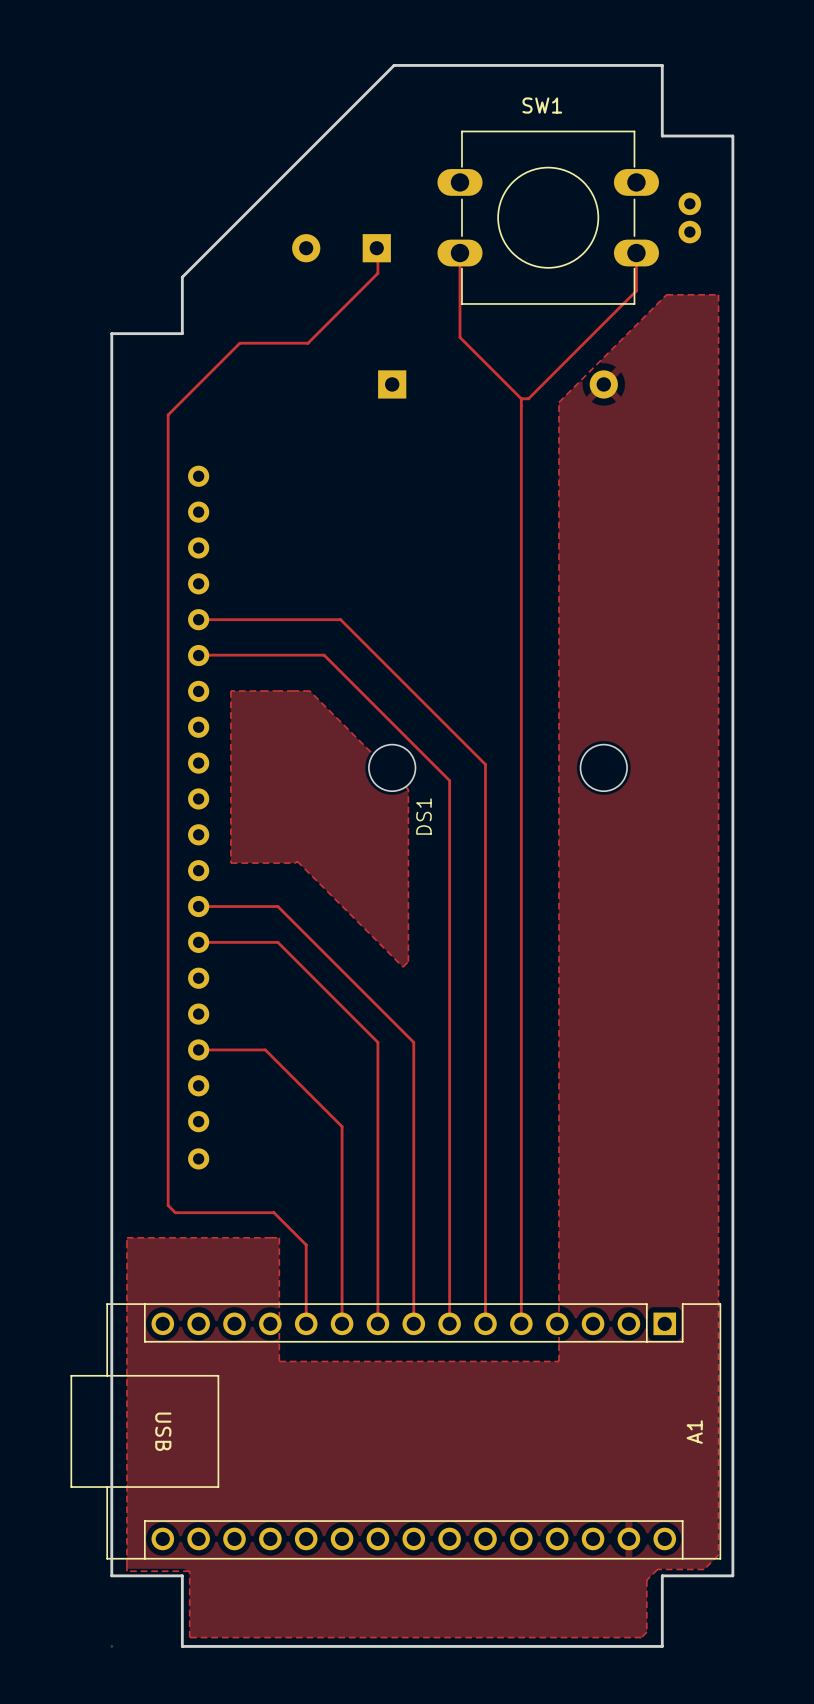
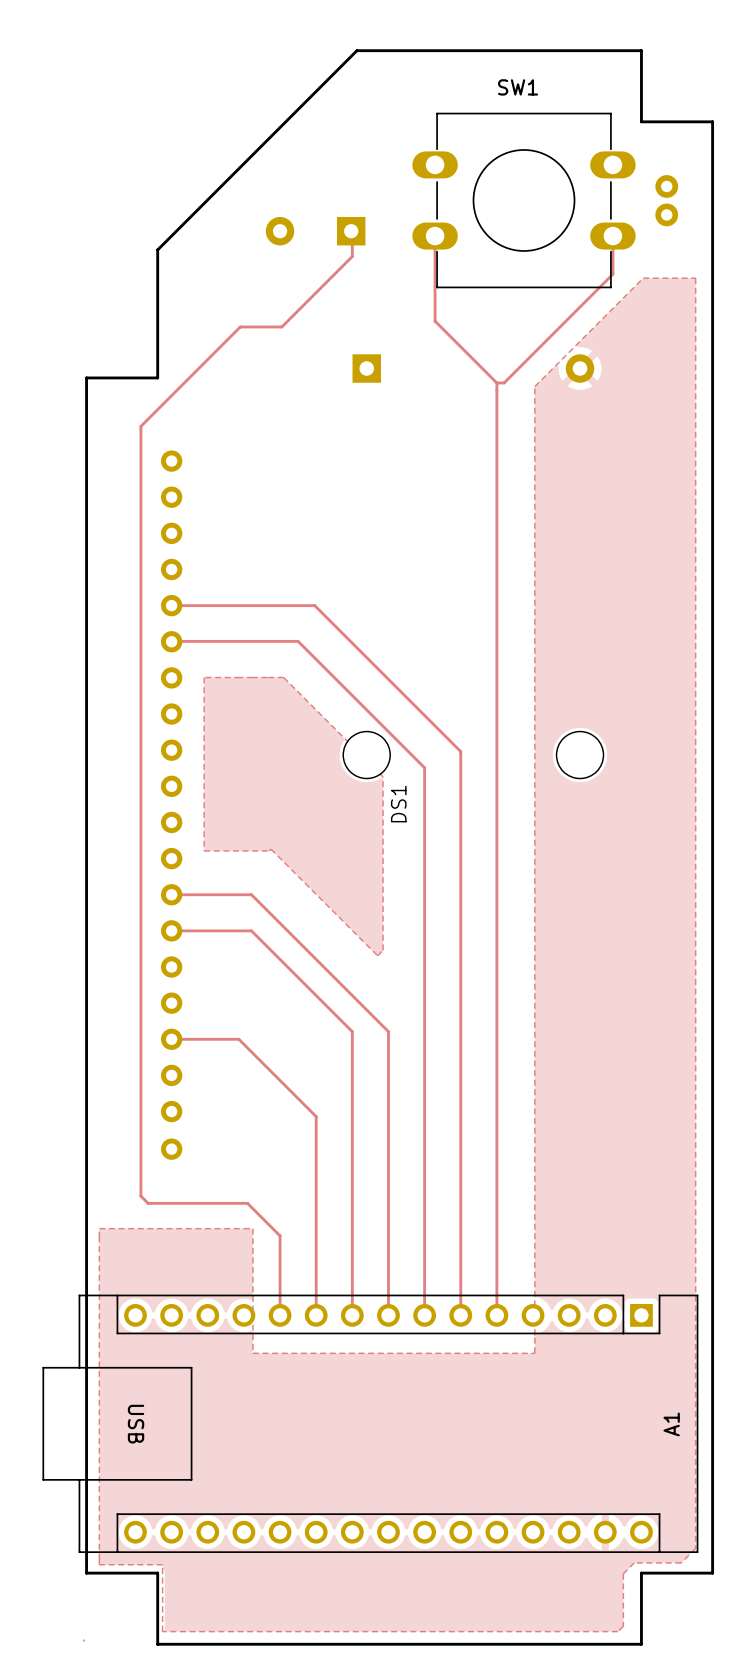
board edge: (394, 65) (182, 277) (182, 333) (111, 333) (111, 1575) (182, 1575) (182, 1646) (662, 1646) (662, 1575) (732, 1575) (732, 136) (662, 136) (662, 65) (394, 65) -> (356, 50) (157, 249) (157, 377) (86, 377) (86, 1573) (157, 1573) (157, 1644) (641, 1644) (641, 1573) (712, 1573) (712, 121) (641, 121) (641, 50) (356, 50)
track: (266, 343) (239, 343) (168, 414) (168, 441) -> (240, 326) (140, 426)

